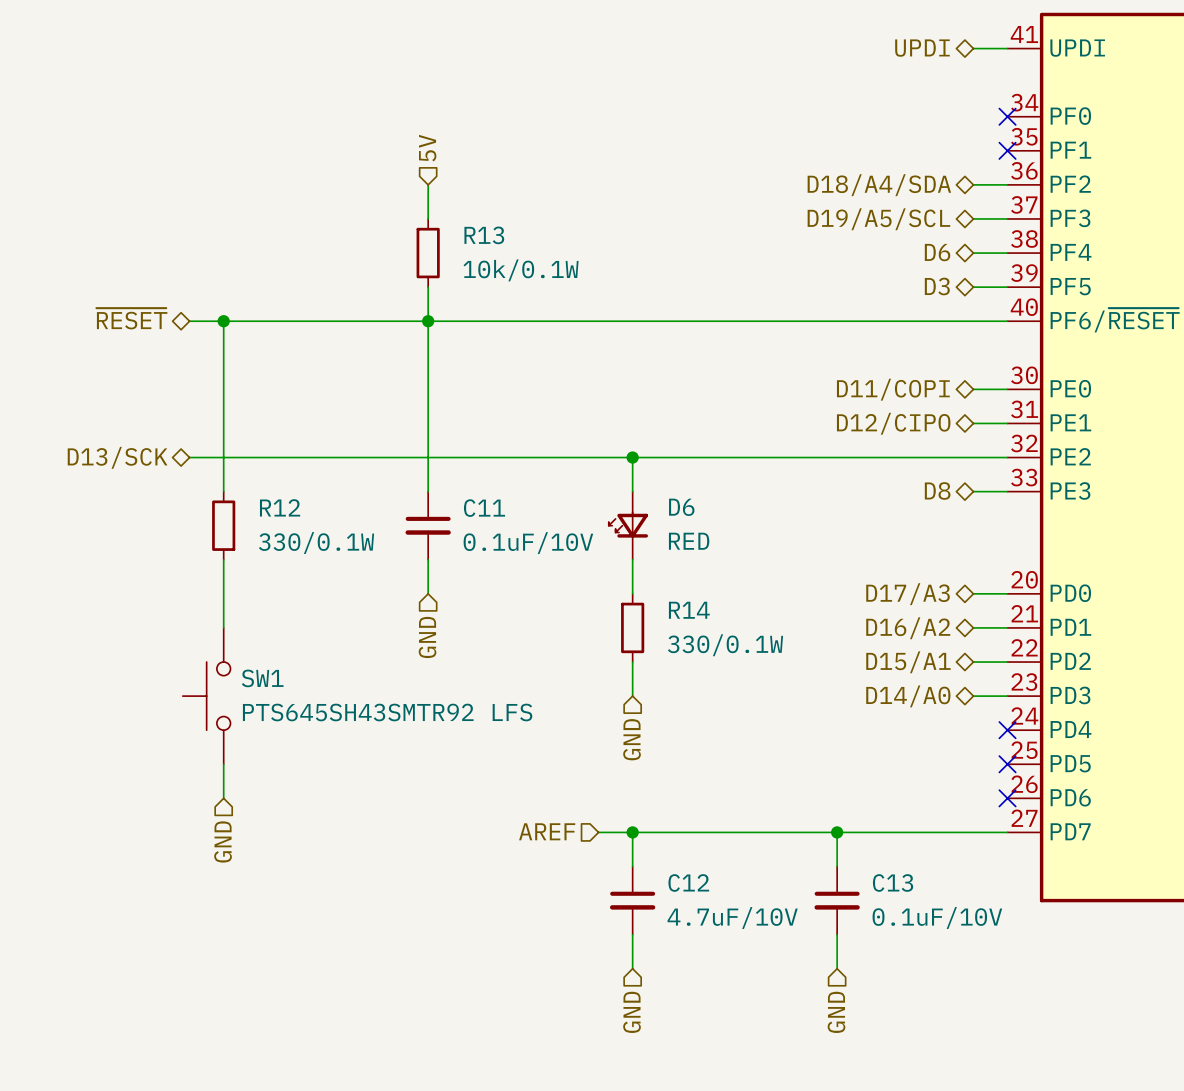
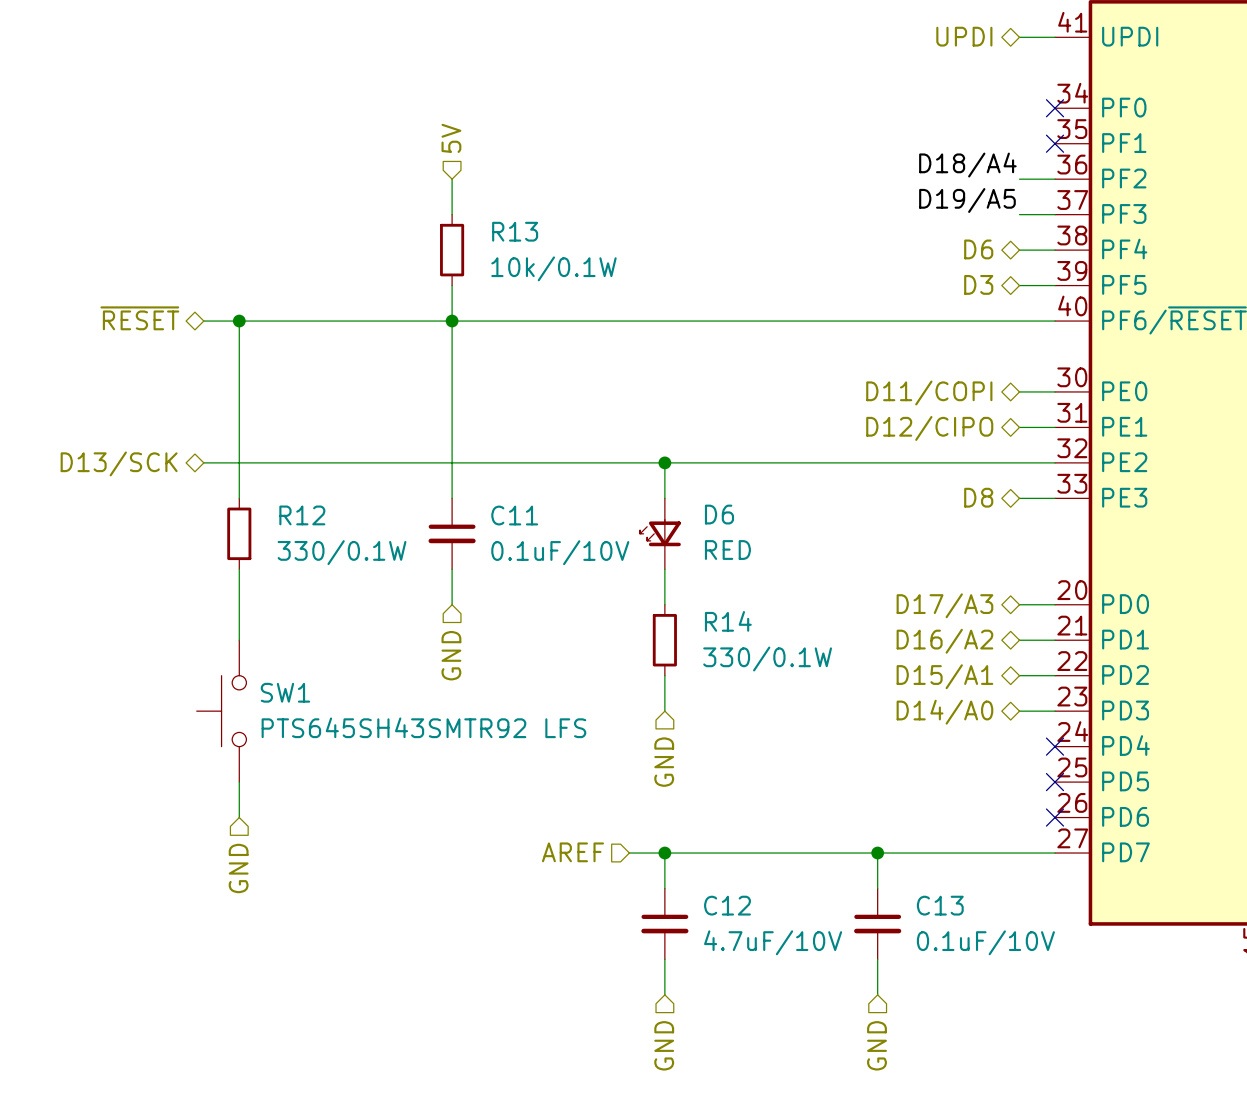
label: none -> D18/A4 (967, 165)
hierarchical label: D18/A4/SDA (879, 185) -> none
label: none -> D19/A5 (967, 200)
hierarchical label: D19/A5/SCL (878, 219) -> none

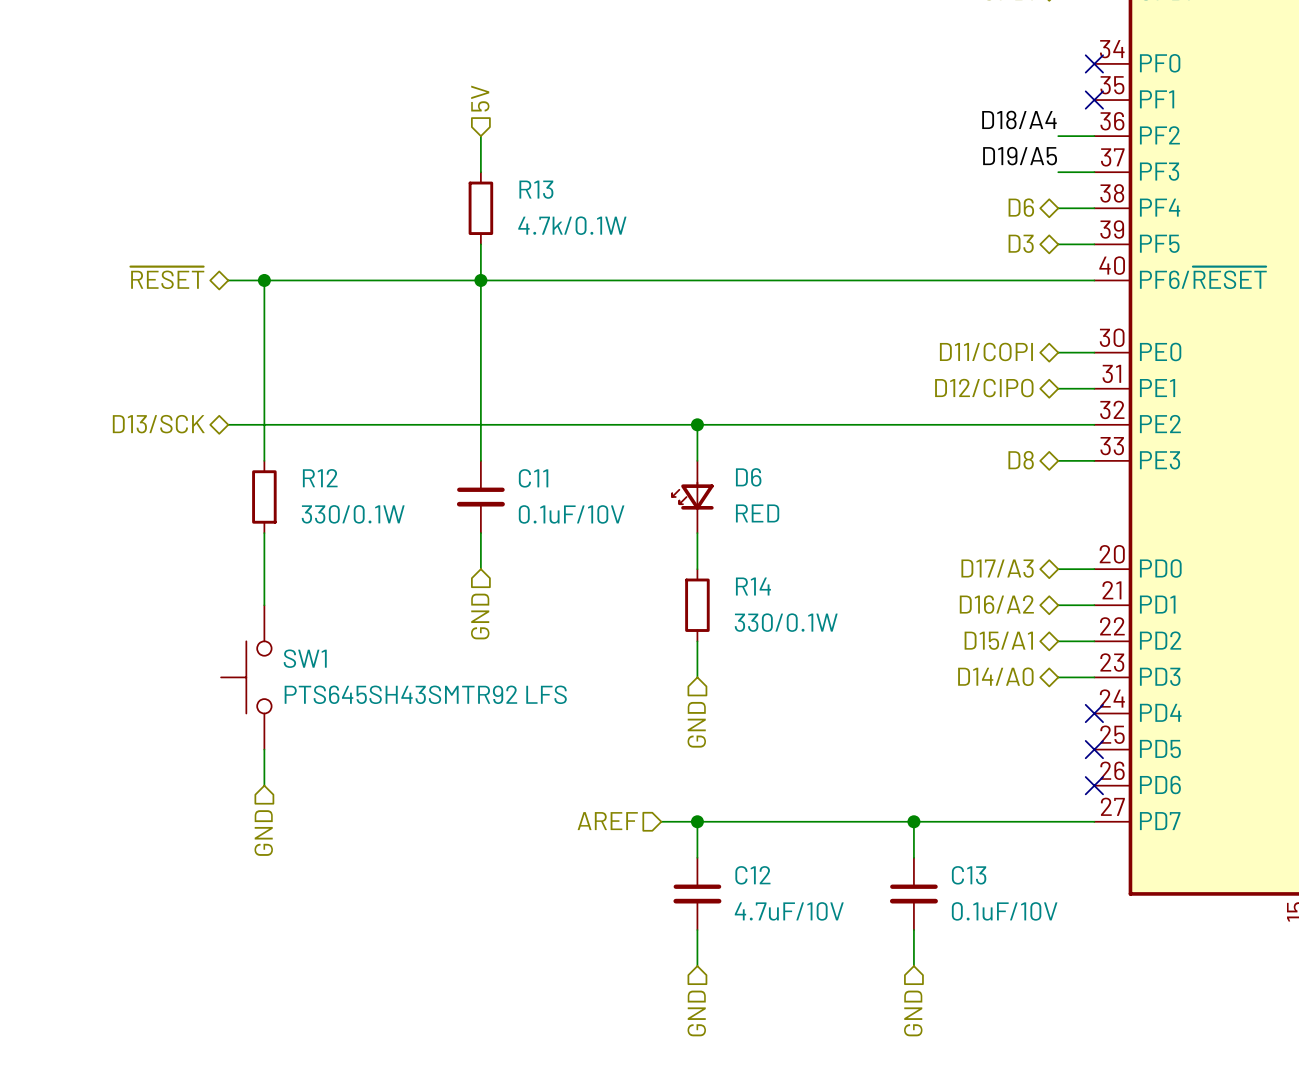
R13 value: 10k/0.1W (553, 268) -> 4.7k/0.1W (572, 225)

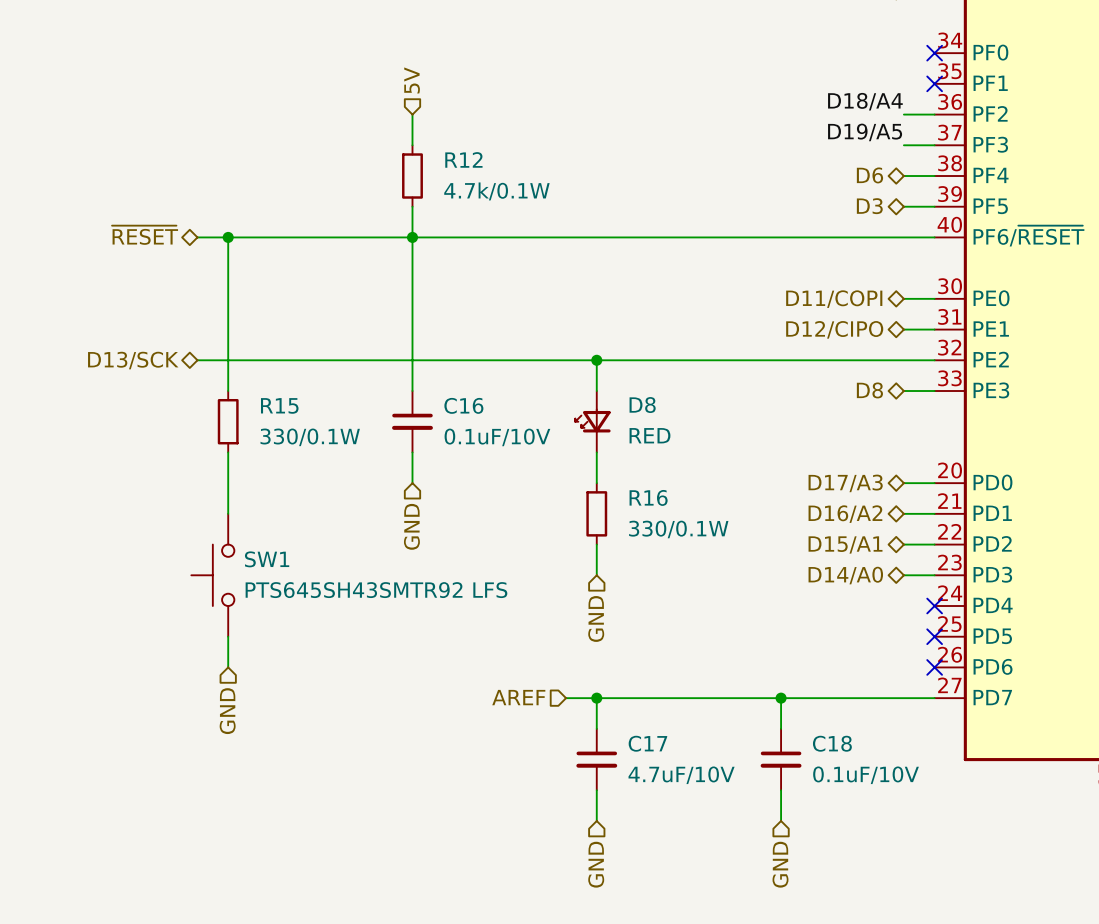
R13 name: R13 (536, 189) -> R12 (463, 159)
D6 name: D6 (748, 477) -> D8 (642, 405)
R12 name: R12 (320, 478) -> R15 (279, 405)
C11 name: C11 (533, 478) -> C16 (463, 405)
R14 name: R14 (753, 586) -> R16 (648, 497)
C12 name: C12 (752, 875) -> C17 (647, 743)
C13 name: C13 (969, 875) -> C18 (832, 743)

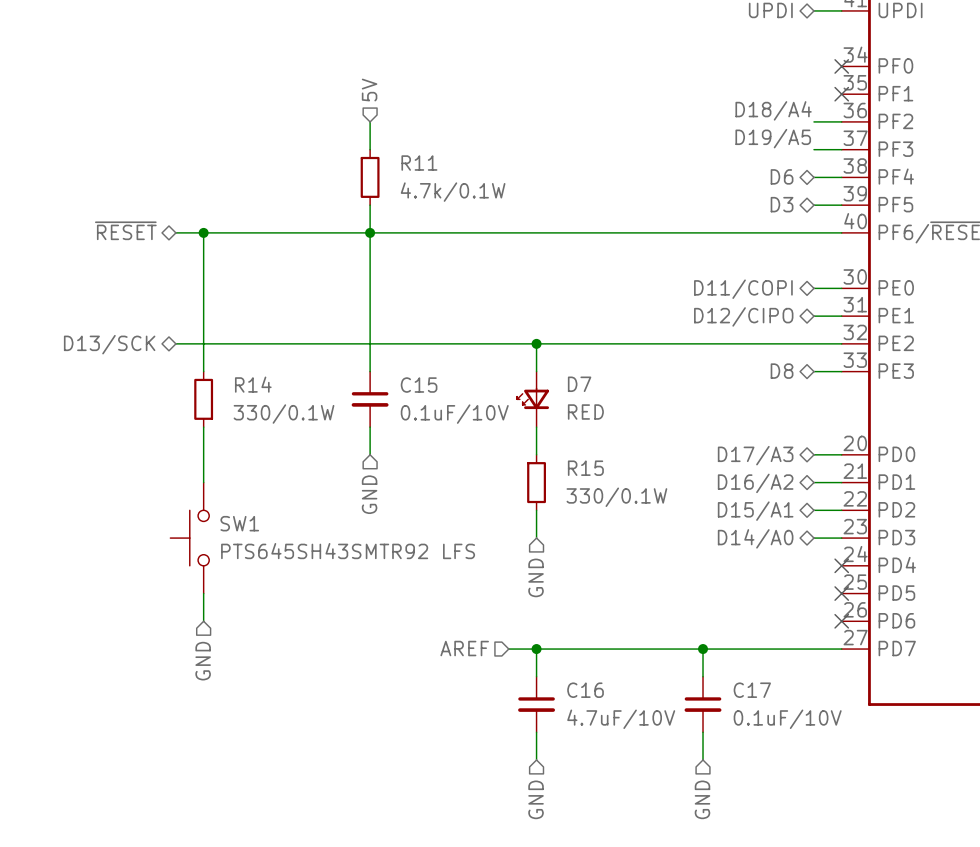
R12 name: R12 (463, 159) -> R11 (419, 163)
R15 name: R15 (279, 405) -> R14 (253, 384)
C16 name: C16 (463, 405) -> C15 (419, 385)
D8 name: D8 (642, 405) -> D7 (579, 384)
R16 name: R16 (648, 497) -> R15 (585, 468)
C17 name: C17 (647, 743) -> C16 (585, 690)
C18 name: C18 (832, 743) -> C17 (752, 690)

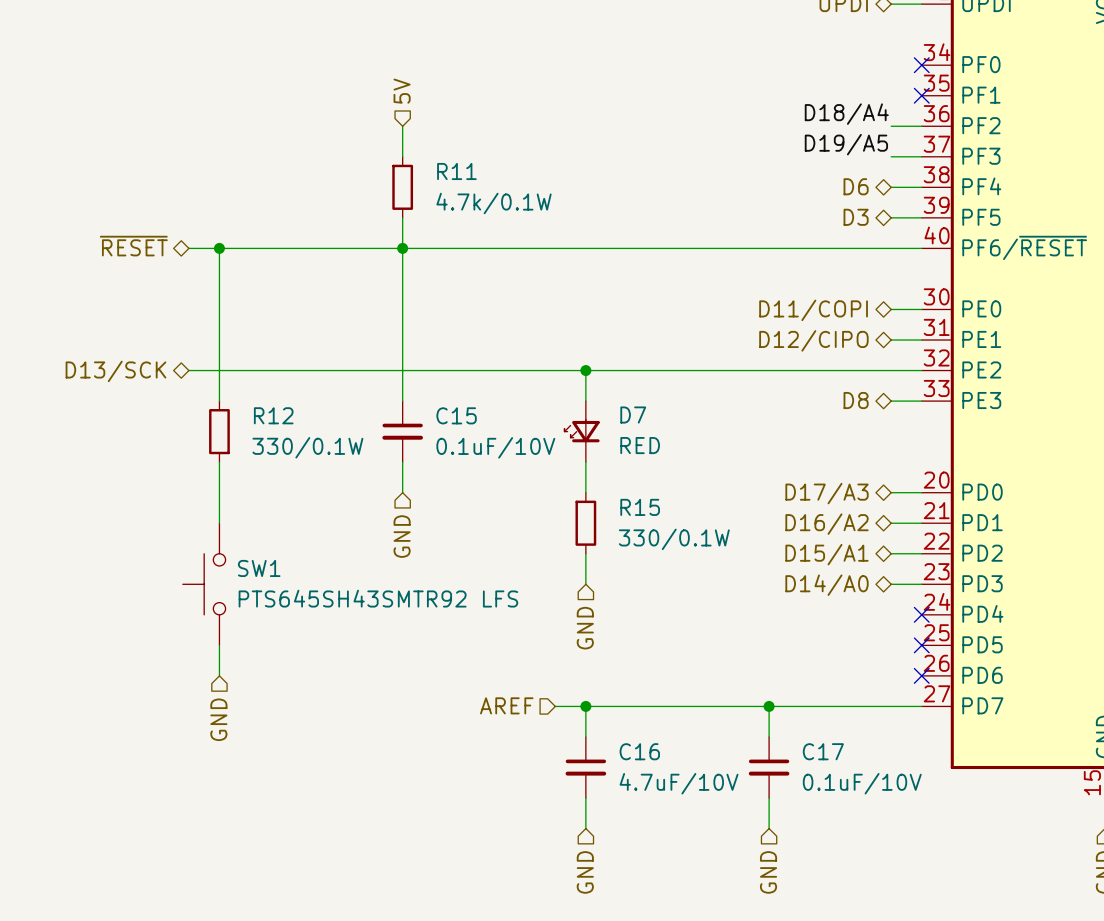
R14 name: R14 (253, 384) -> R12 (273, 415)

